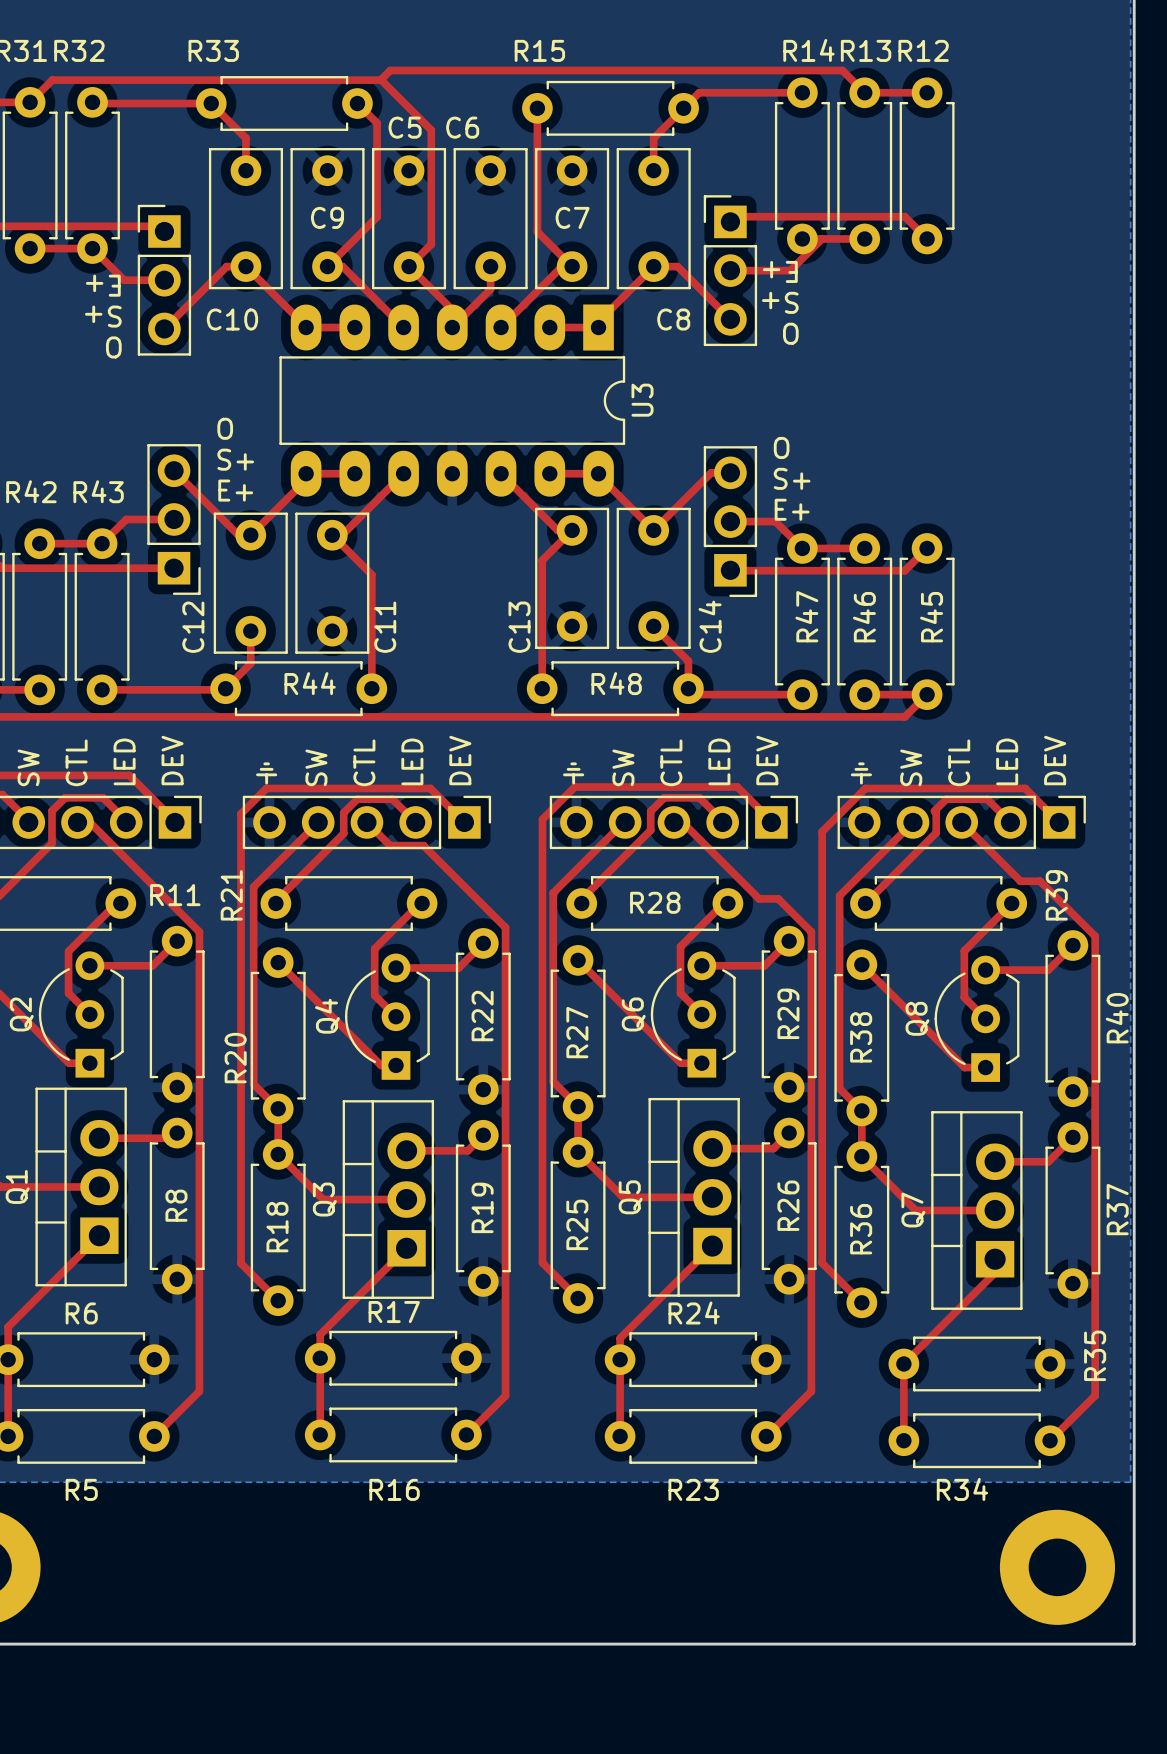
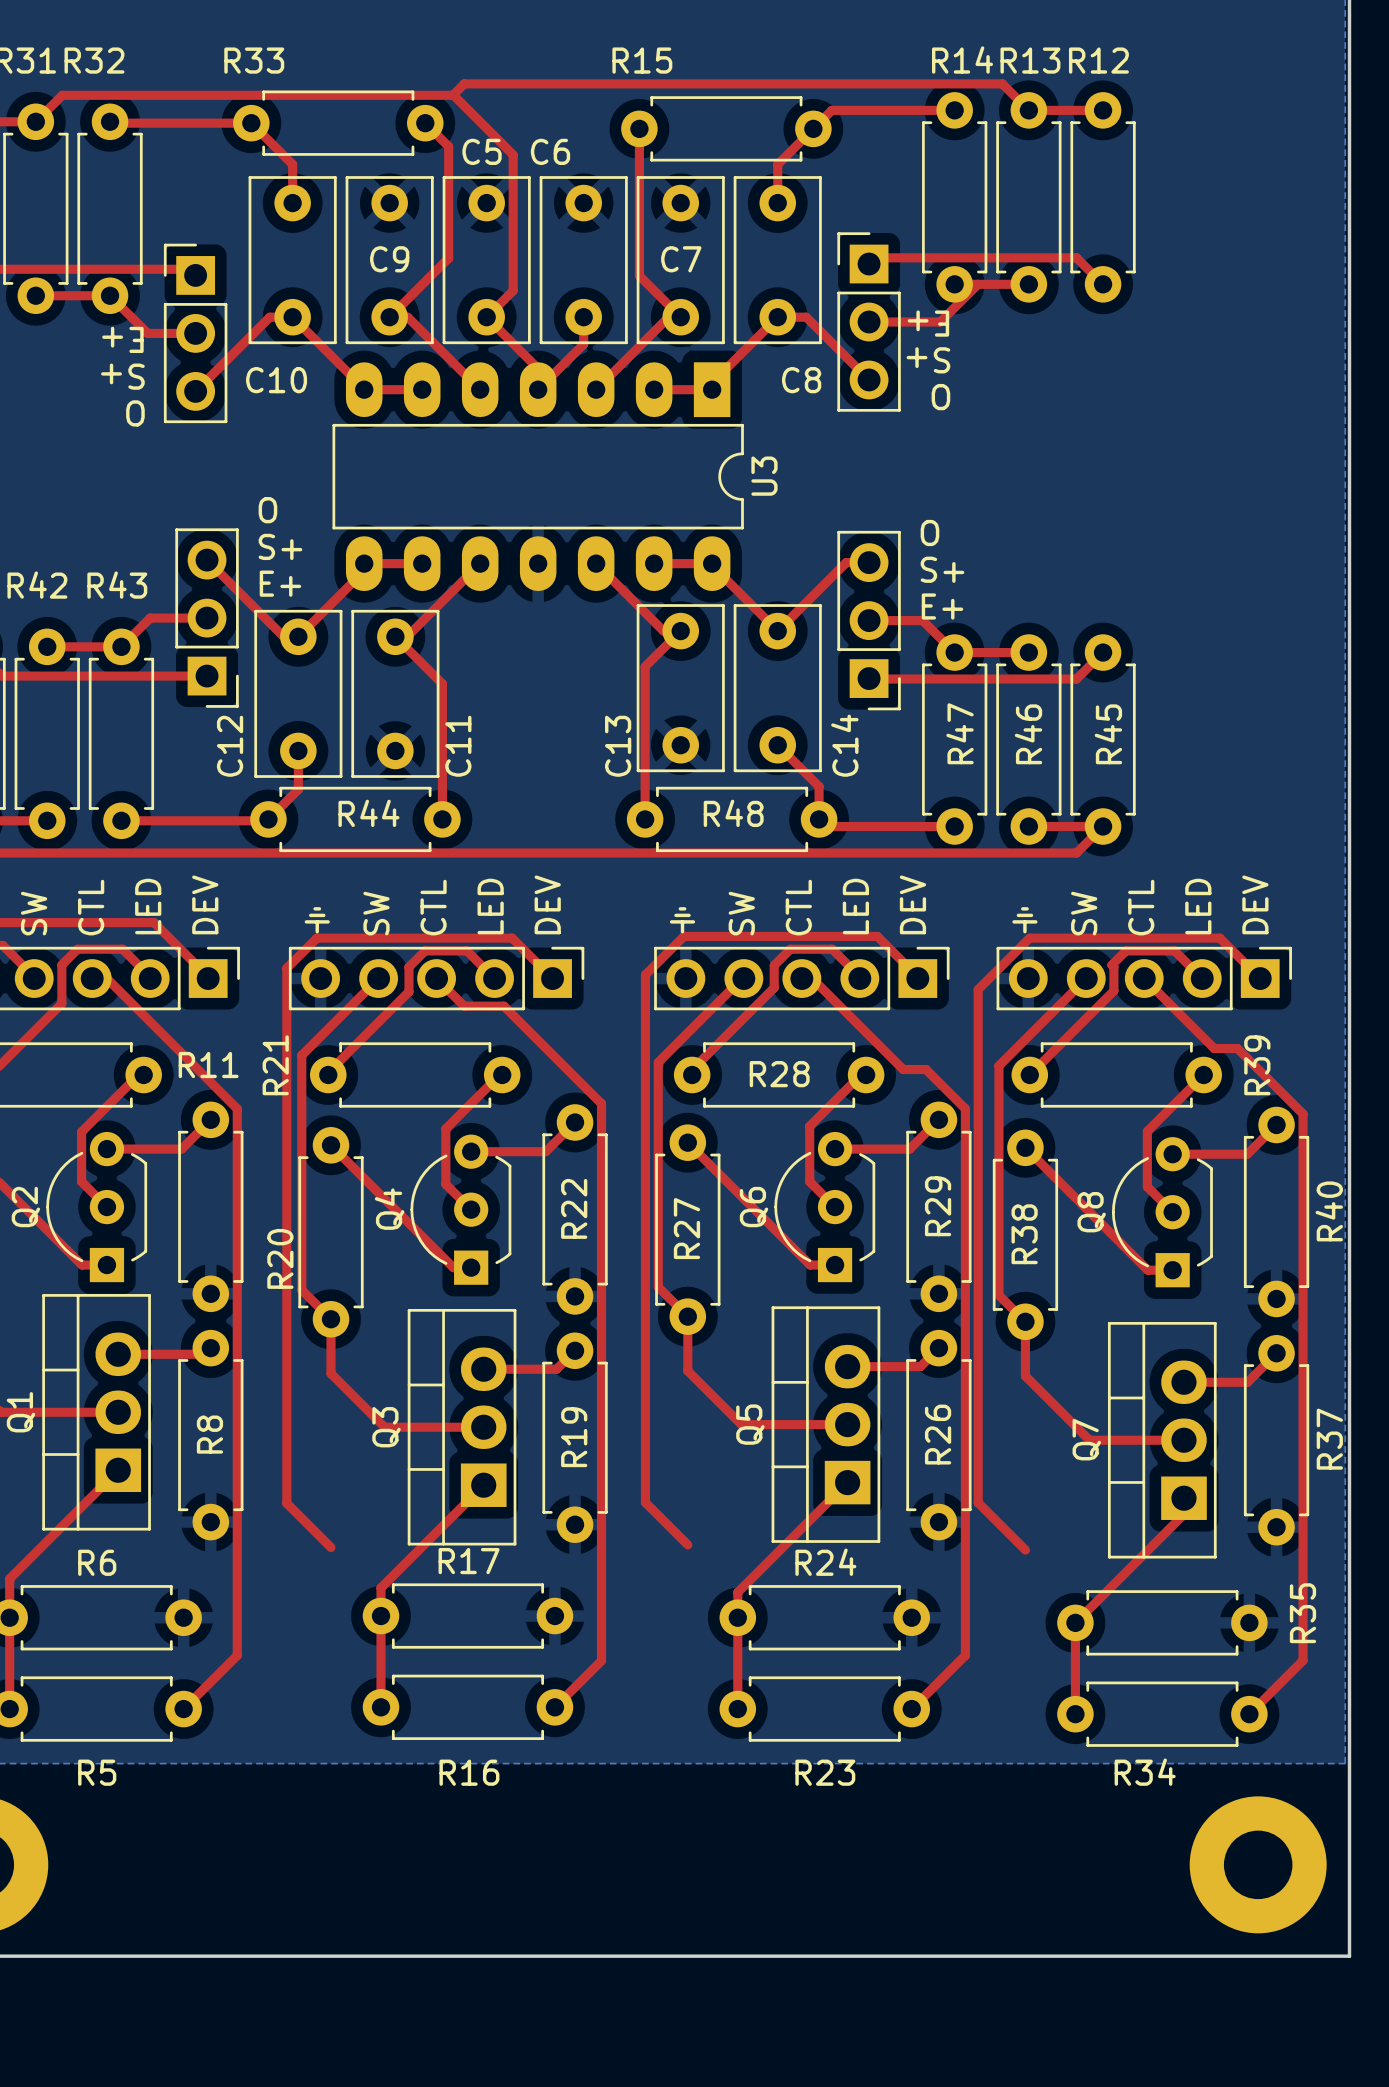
R25: (578, 1225) -> none
R18: (278, 1227) -> none
R36: (861, 1229) -> none

